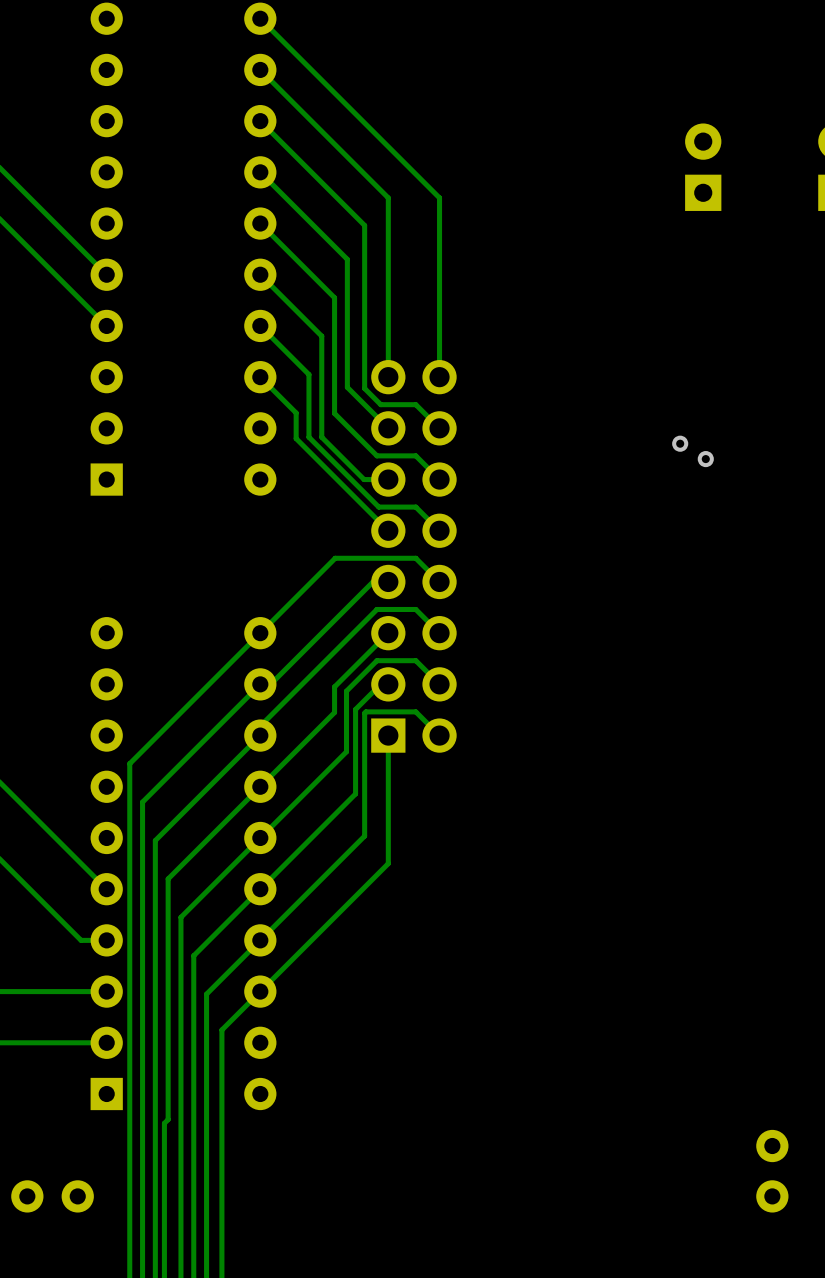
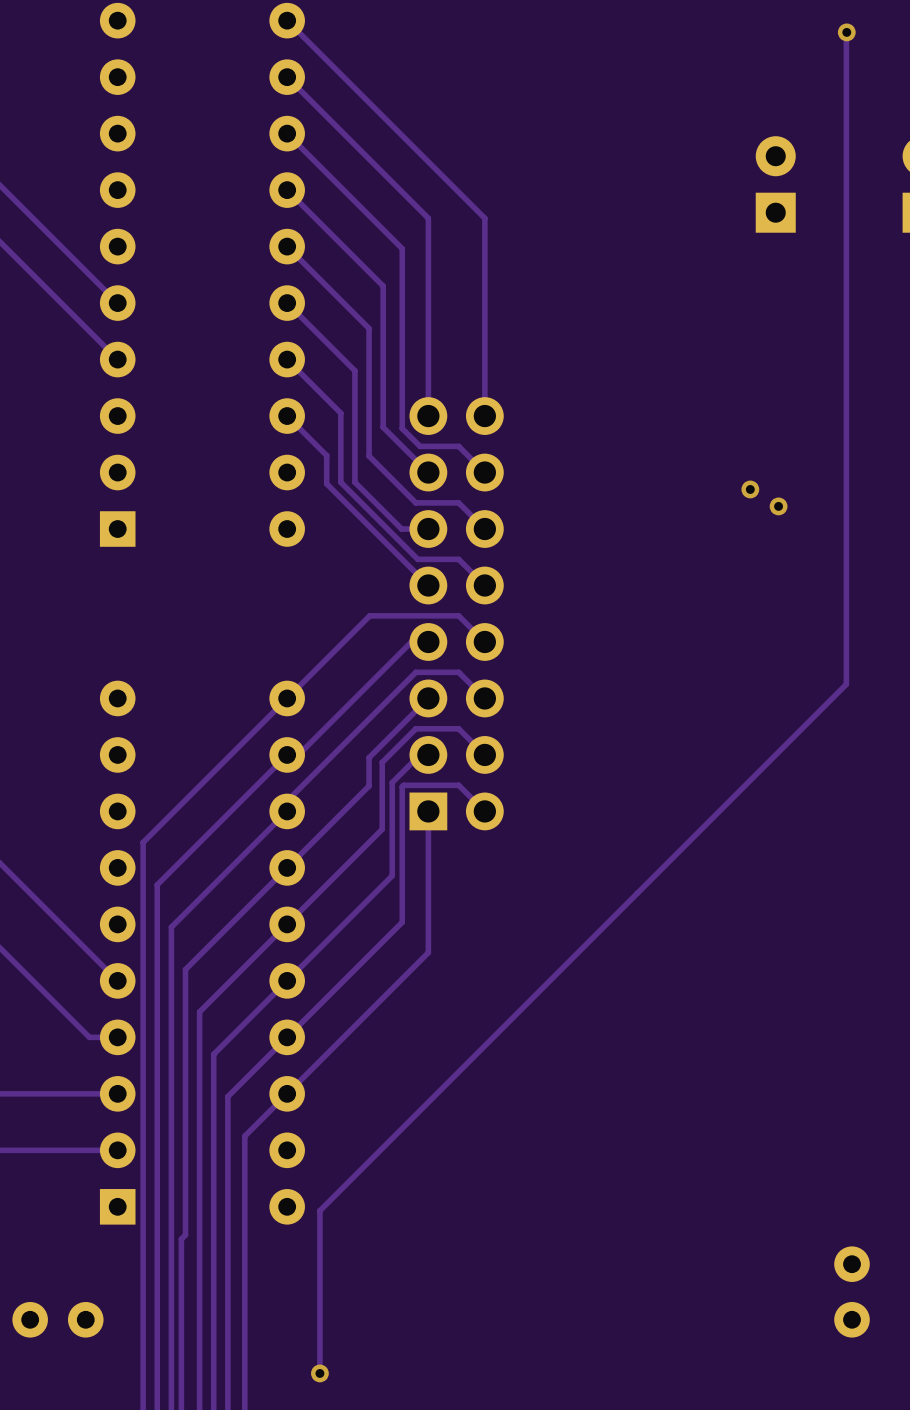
track: none -> (846, 32) (846, 684) (319, 1210) (319, 1373)
via: none -> (846, 32)
via: none -> (319, 1373)

